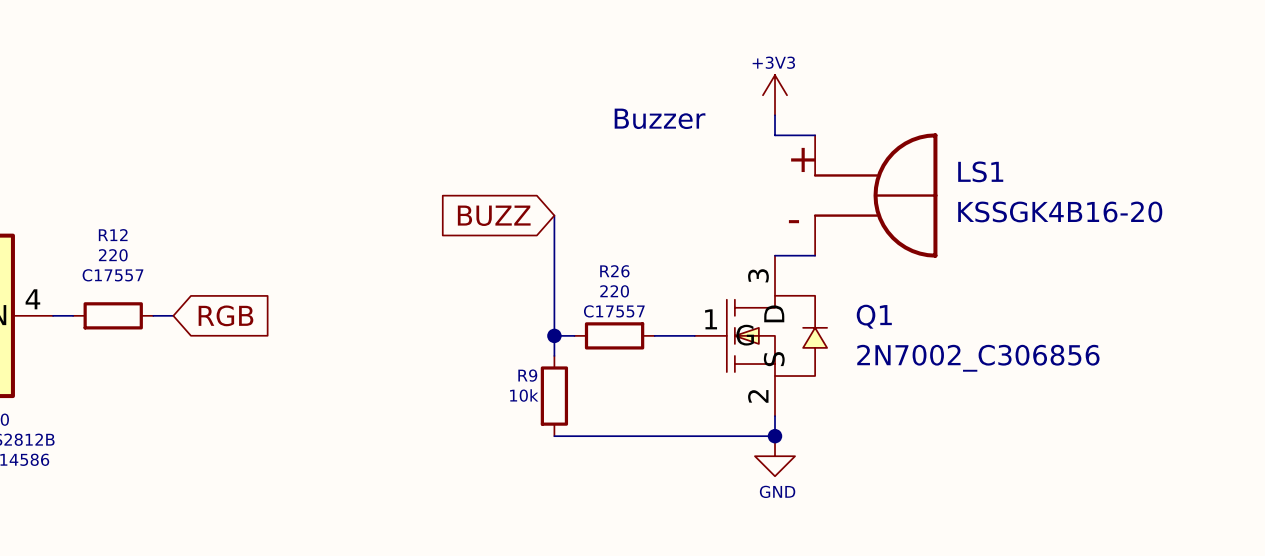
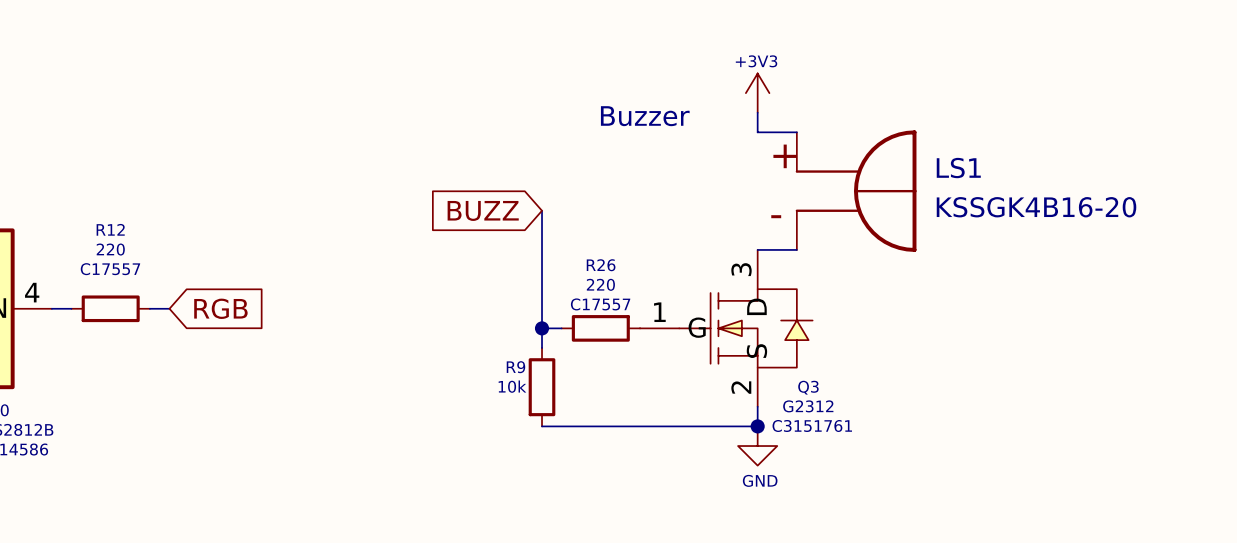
Q3: none -> G2312 (726, 328)
Q1: 2N7002_C306856 (760, 335) -> none

